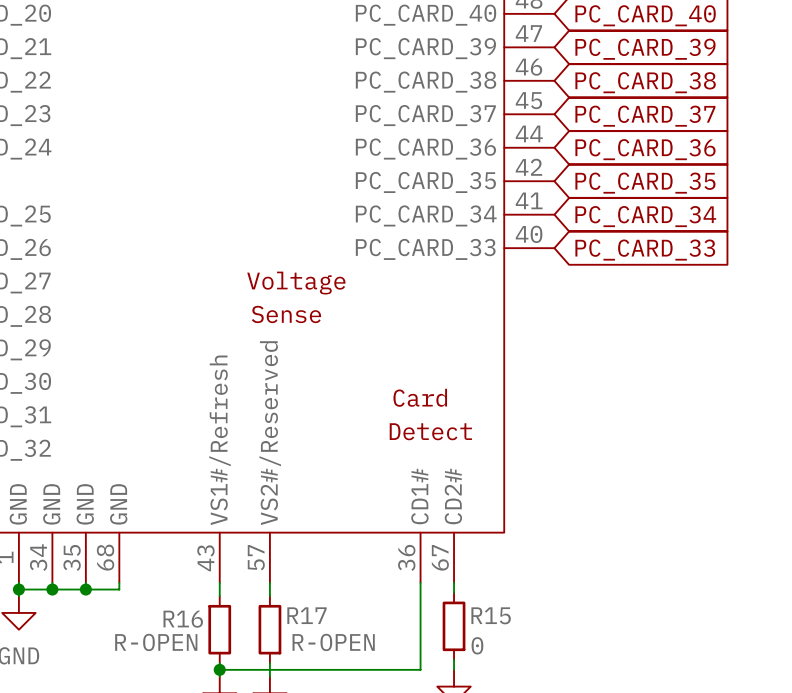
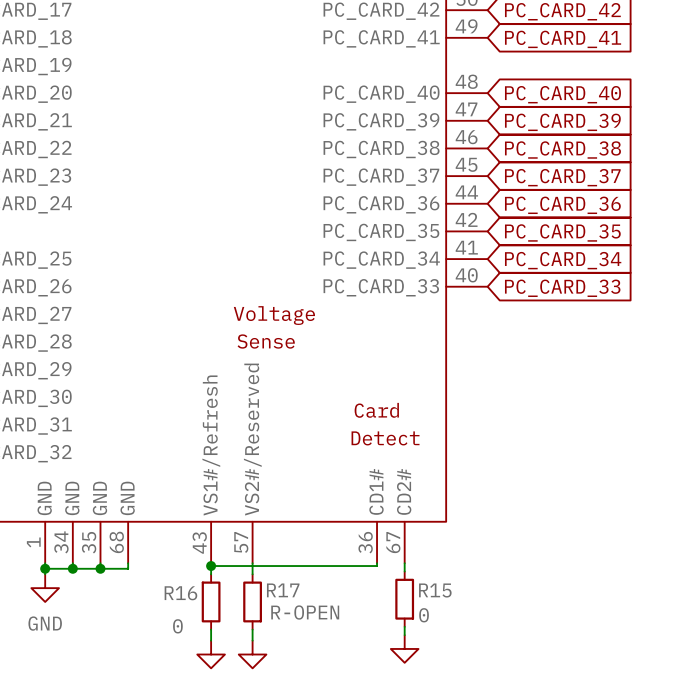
junction: none -> (211, 566)
wire: (420, 586) (420, 669) (219, 669) -> (377, 566) (211, 566)
R16 value: R-OPEN (156, 642) -> 0 (177, 626)
junction: (219, 669) -> none

